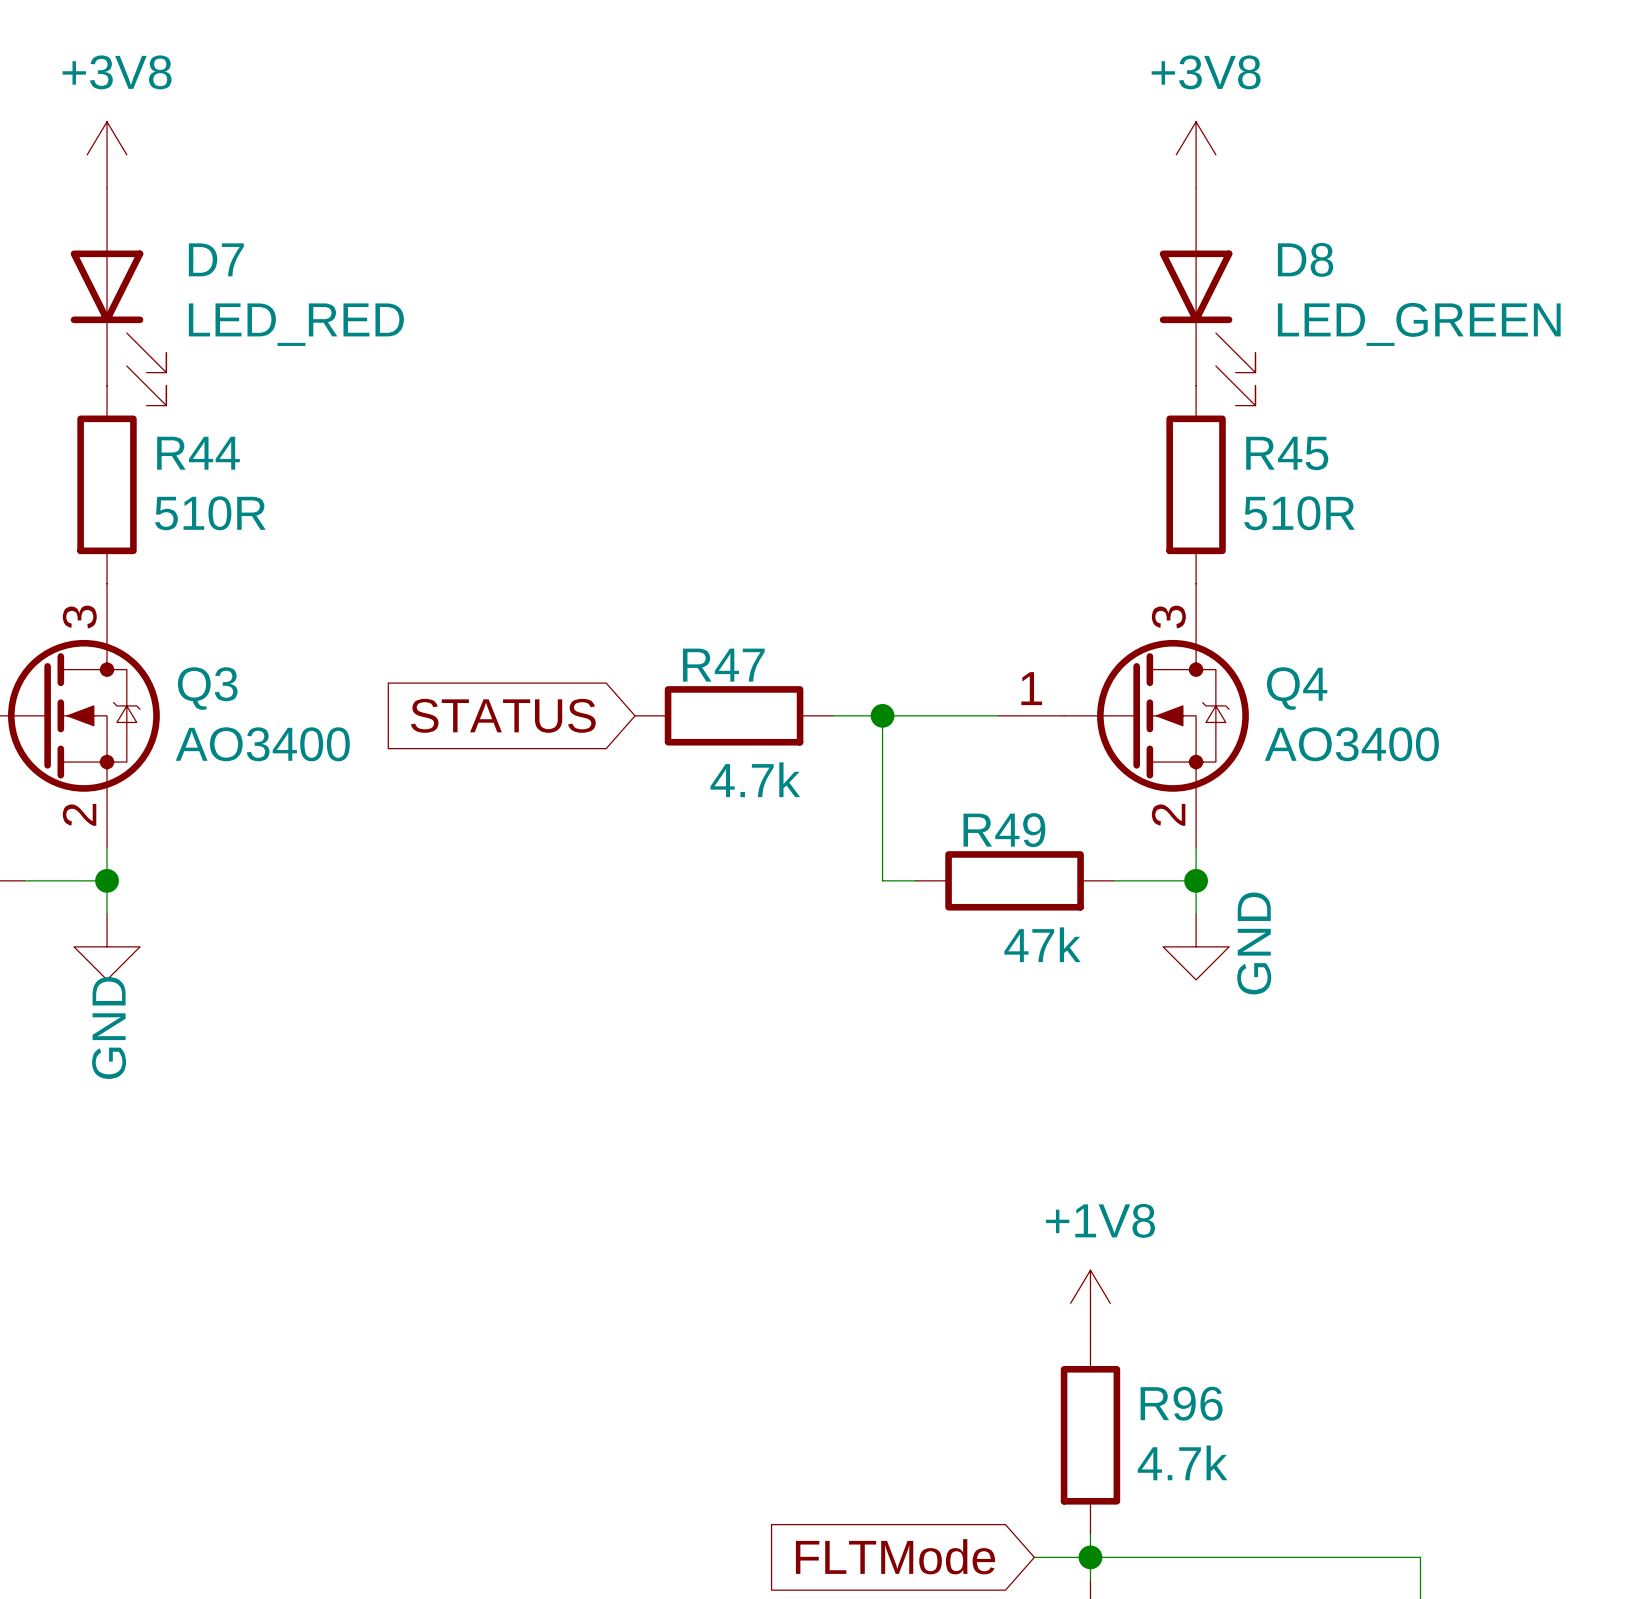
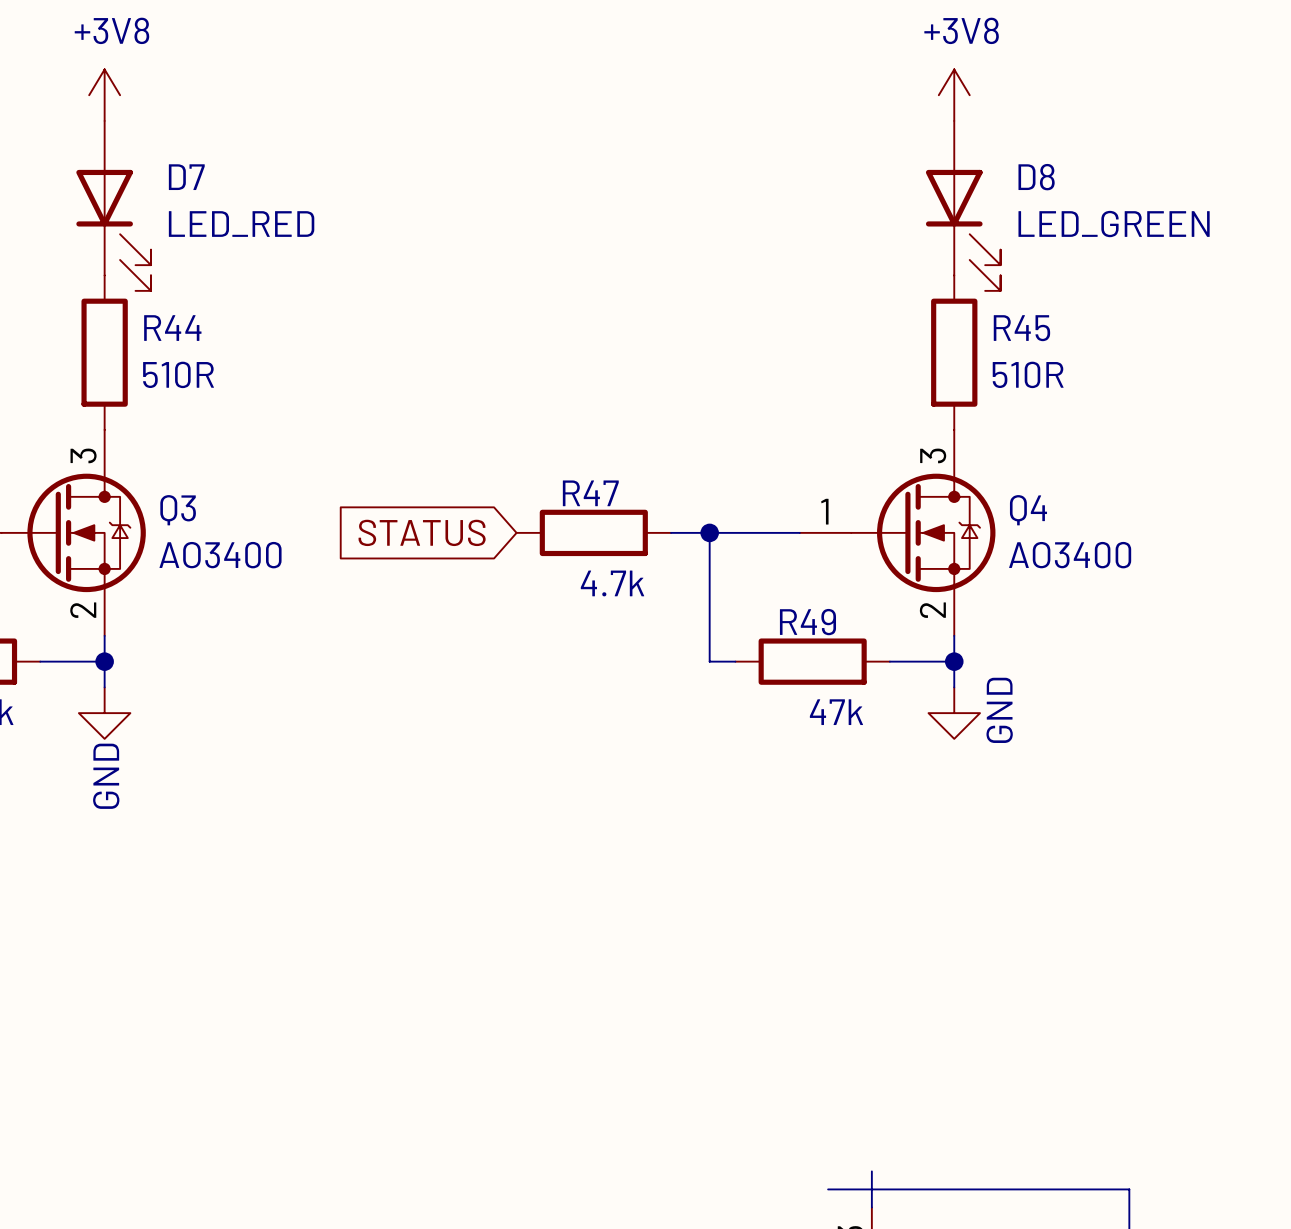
power symbol: +1V8 (1090, 1303) -> none
R96: 4.7k (1090, 1435) -> none
global label: FLTMode (895, 1556) -> none
junction: (1090, 1557) -> none

